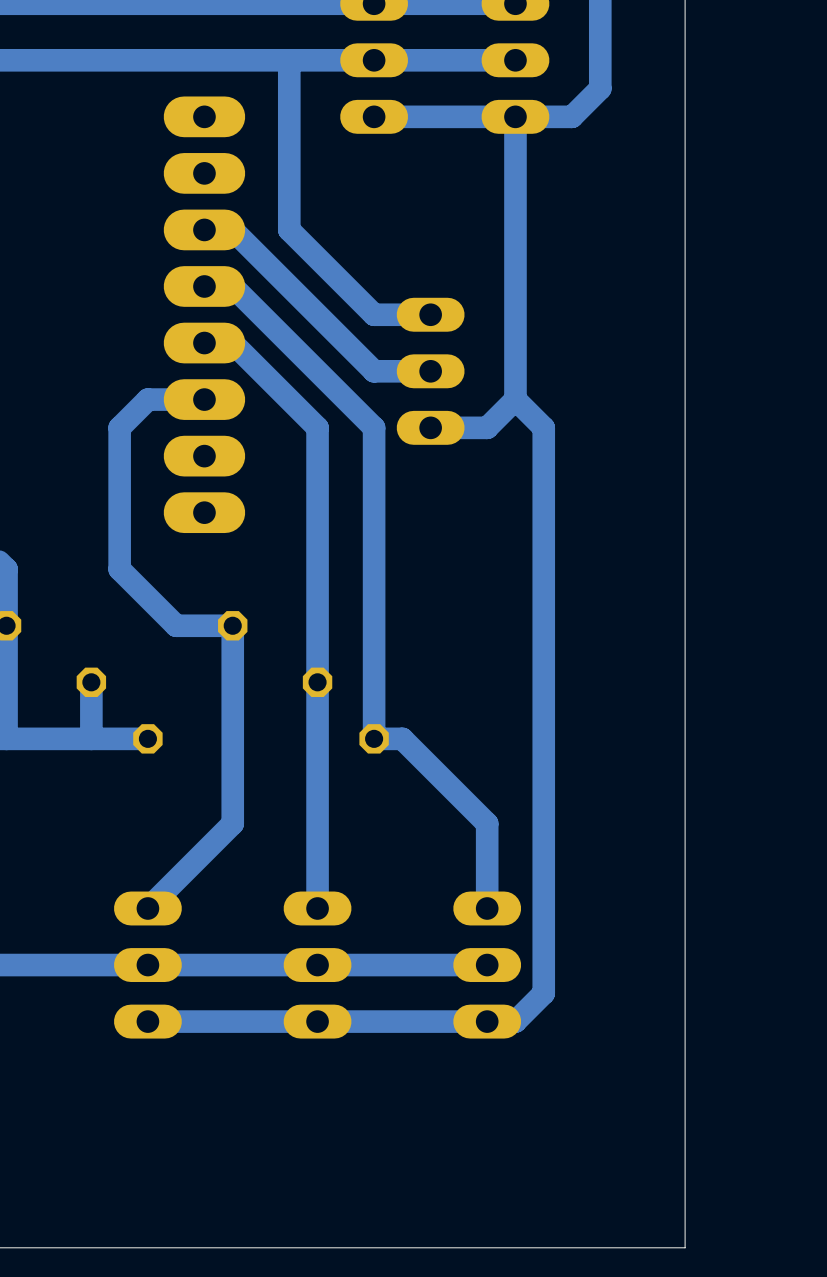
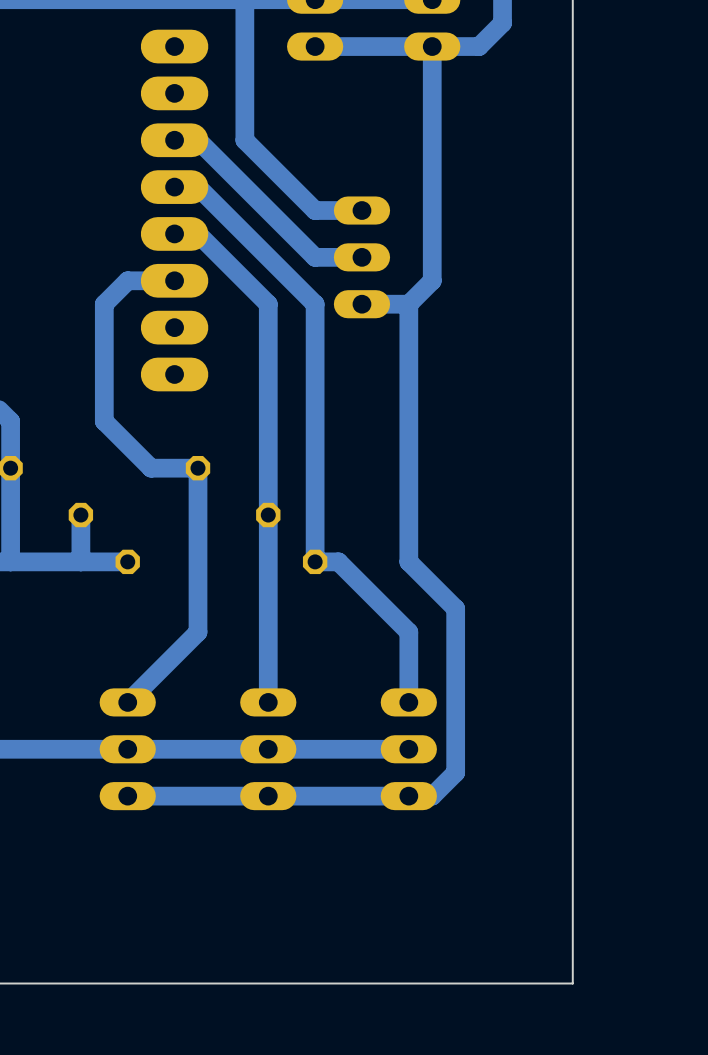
bottom track: (515, 399) (543, 427) (543, 795) -> (408, 304) (408, 561) (455, 608)

